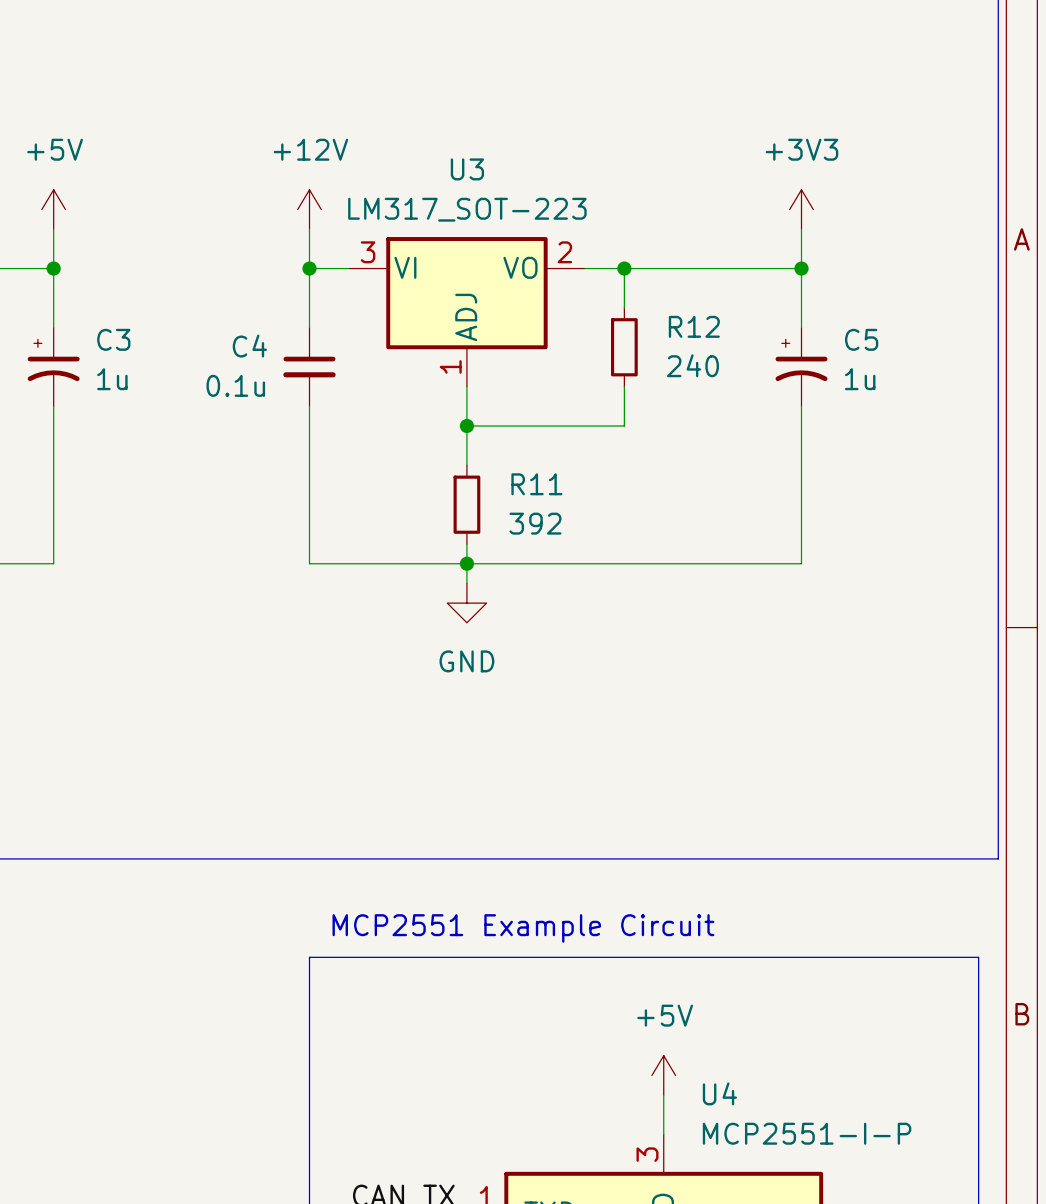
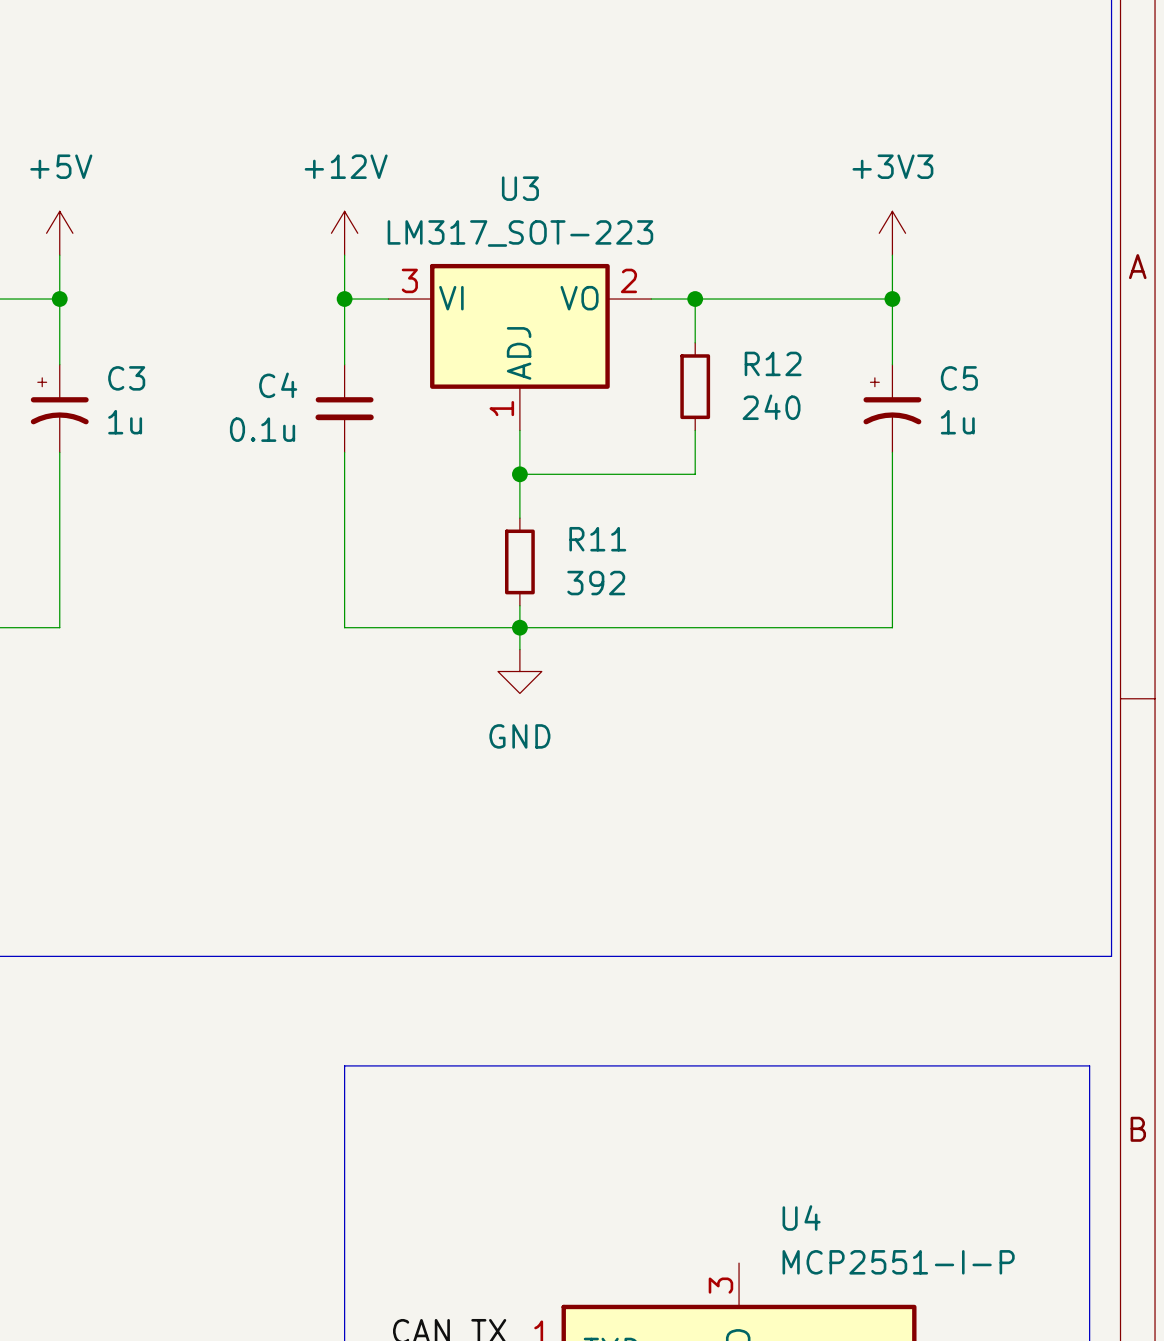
text: MCP2551 Example Circuit (523, 928) -> none
power symbol: +5V (663, 1075) -> none
wire: (663, 1095) (663, 1134) -> none

